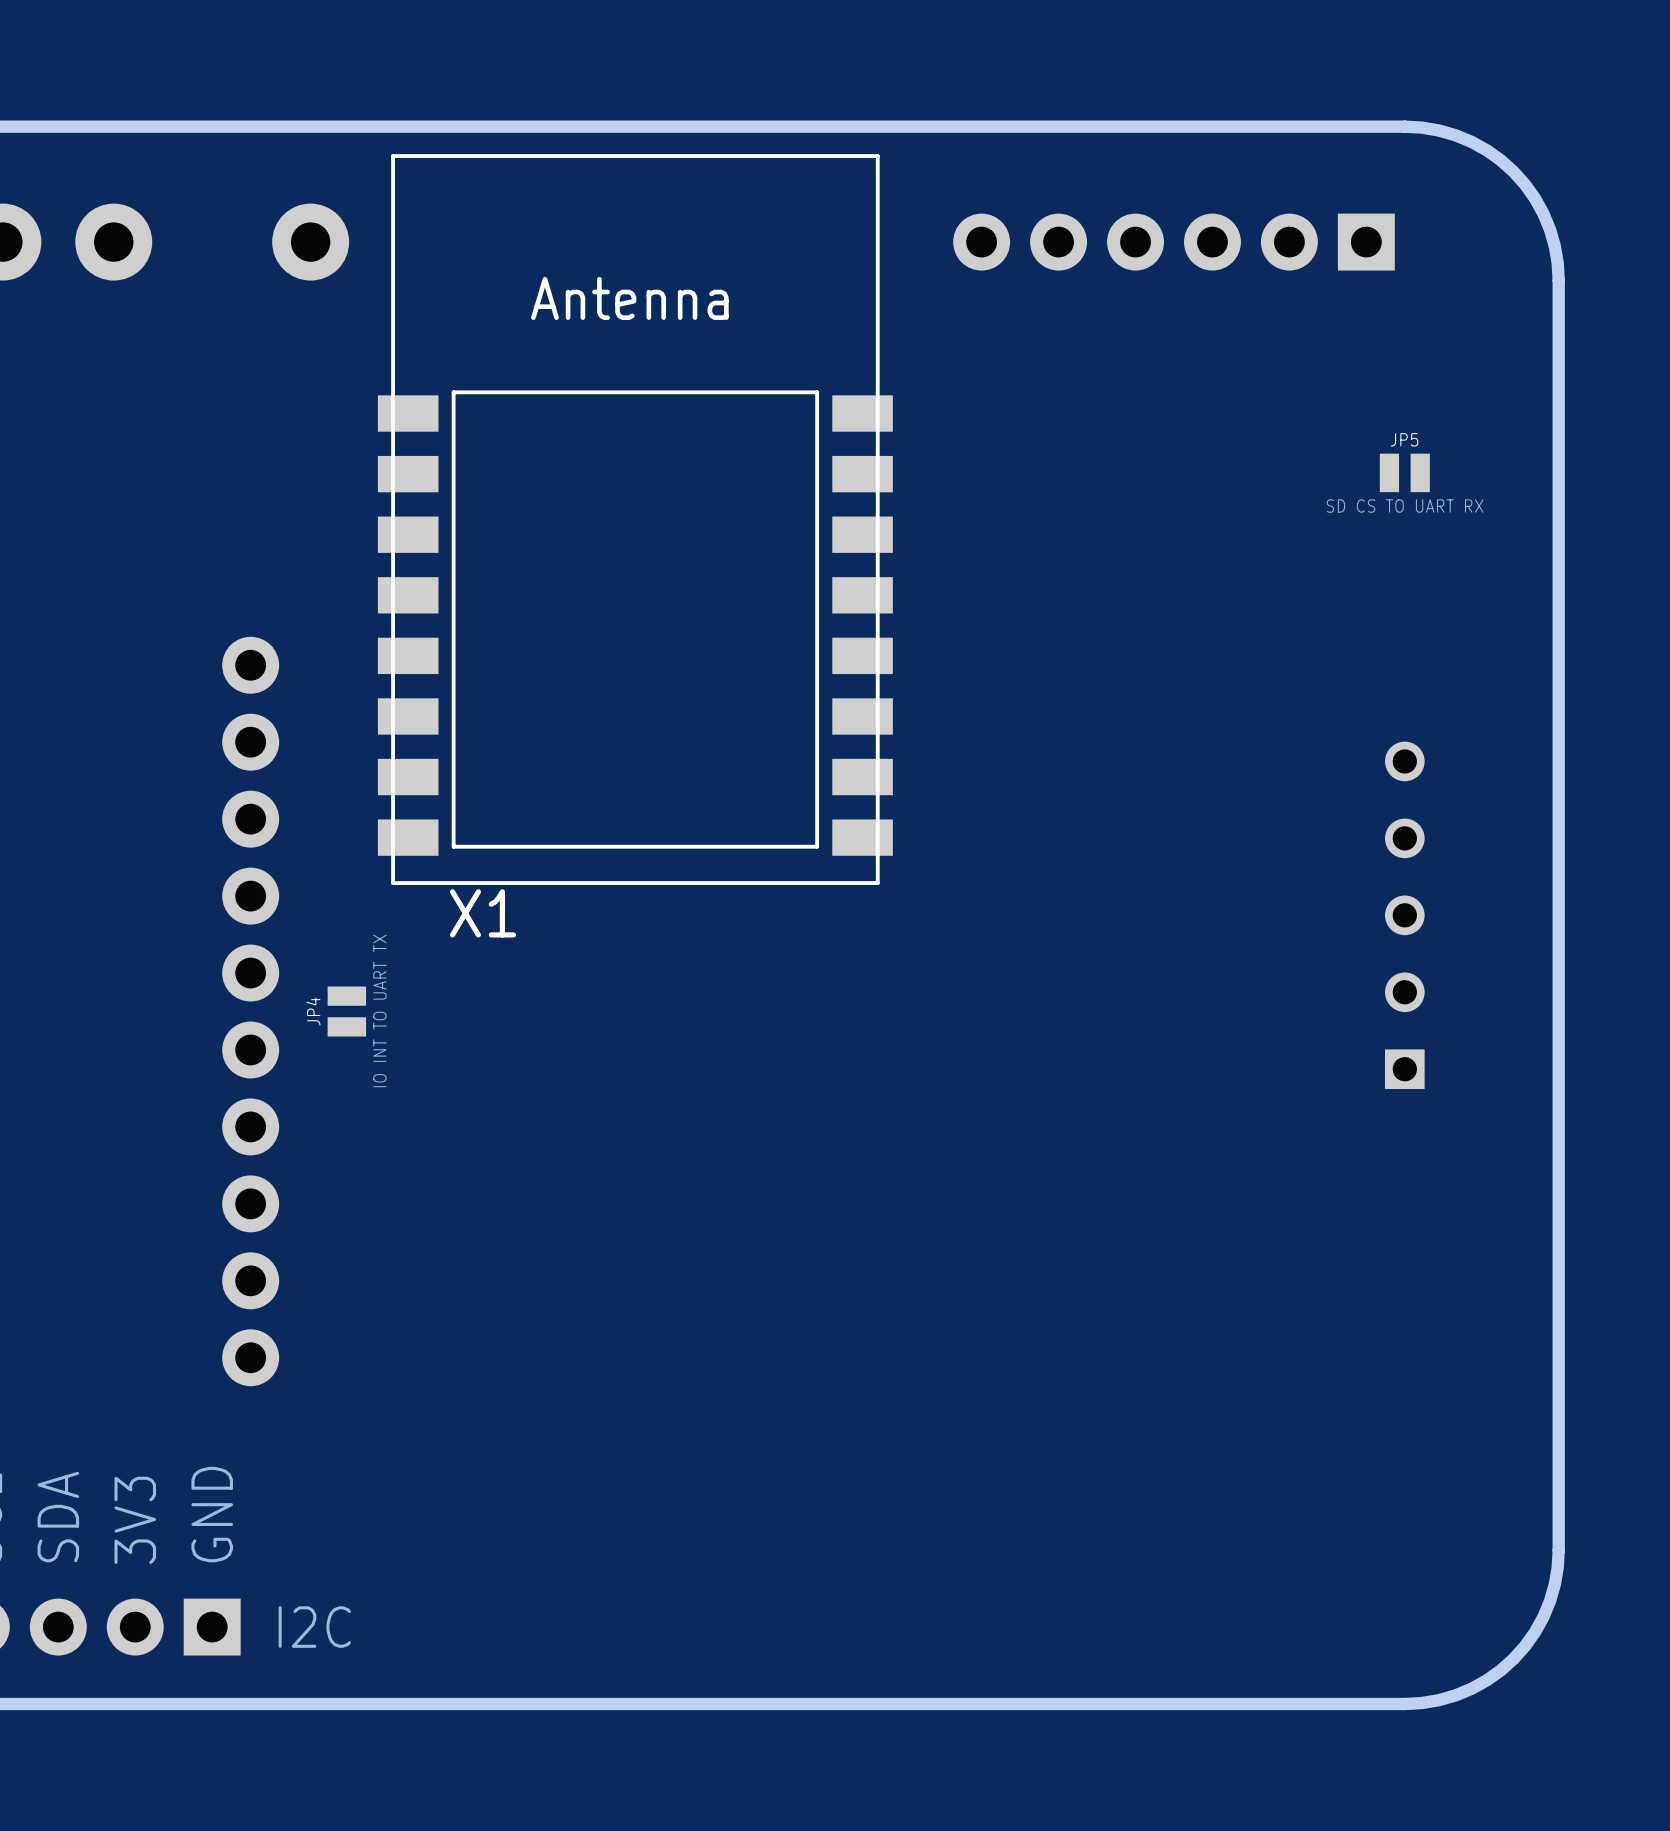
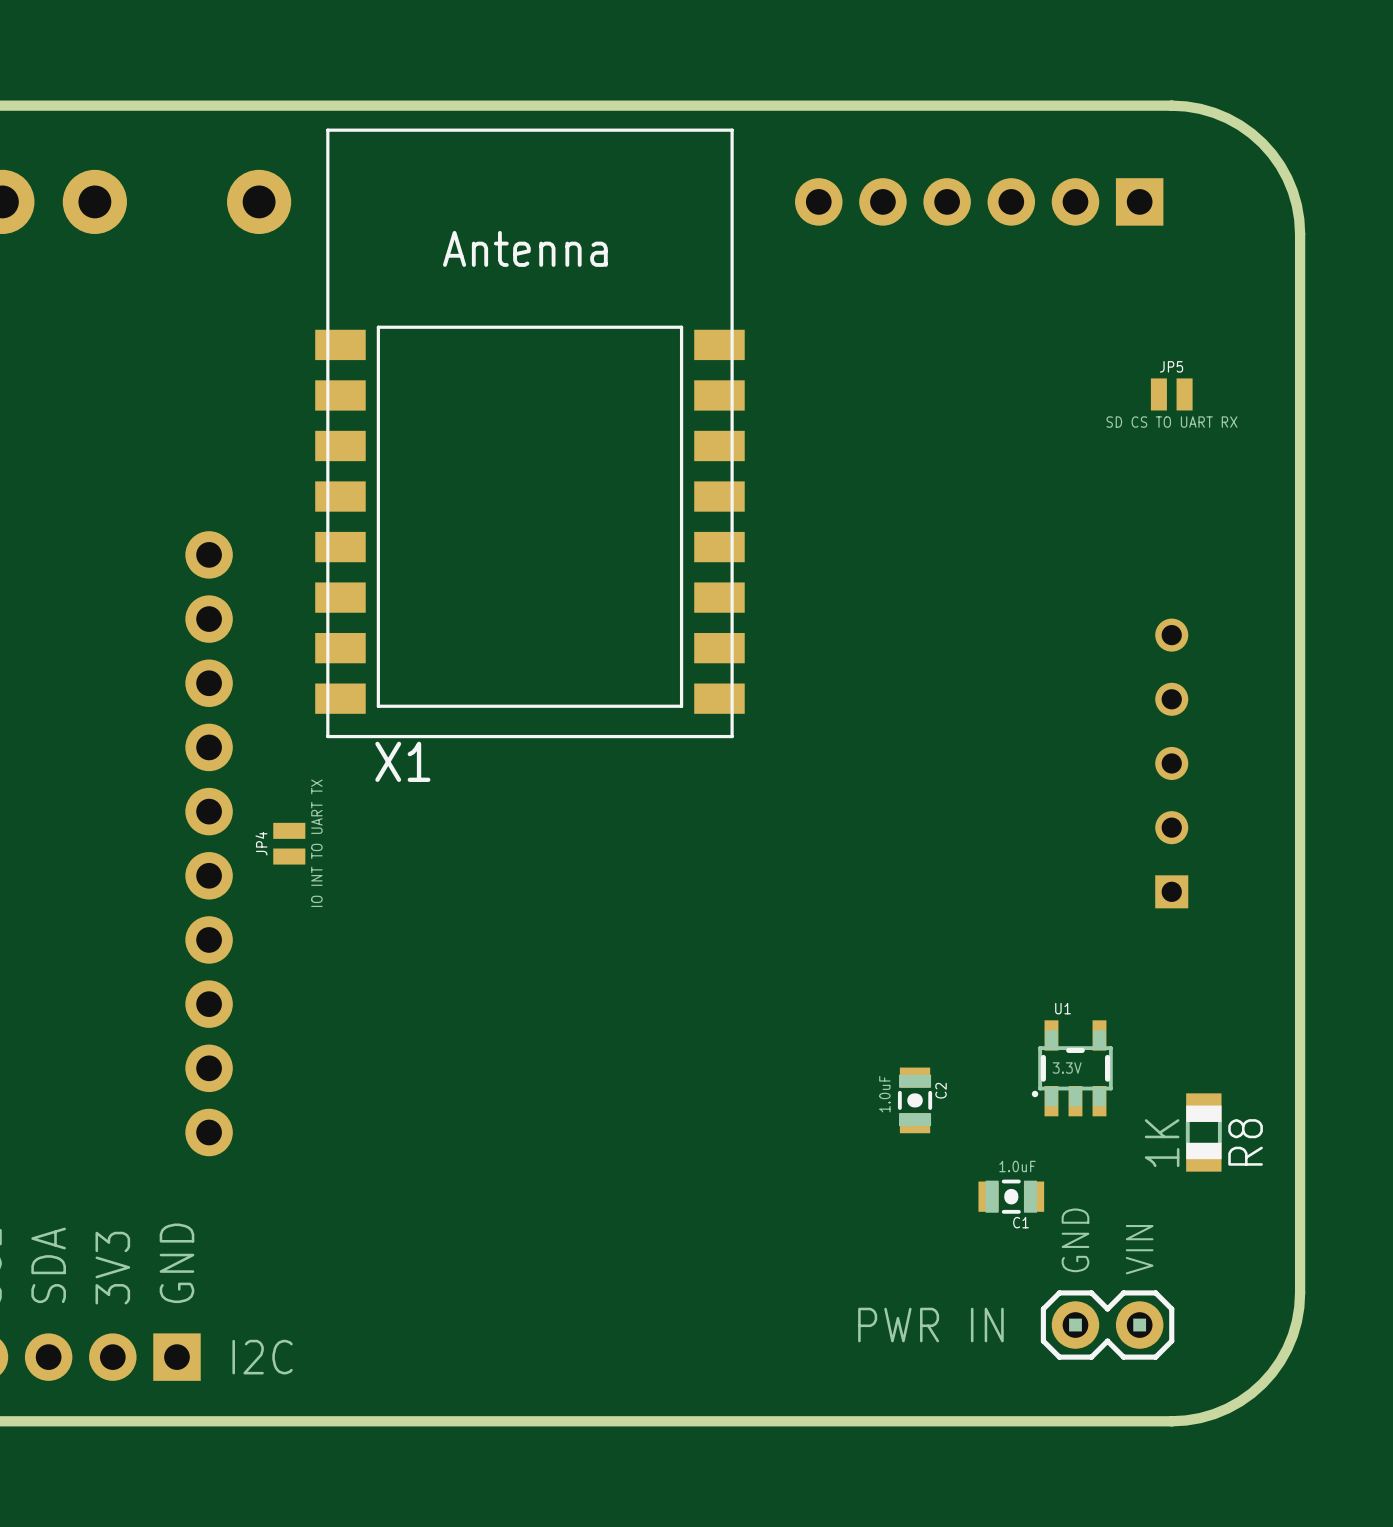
U1: none -> 3.3V (1072, 1068)
C2: none -> 1.0uF (915, 1100)
R8: none -> 1K (1203, 1132)
C1: none -> 1.0uF (1011, 1196)
text: none -> GND (1075, 1240)
text: none -> VIN (1139, 1249)
part: none -> PWR IN (1107, 1325)

